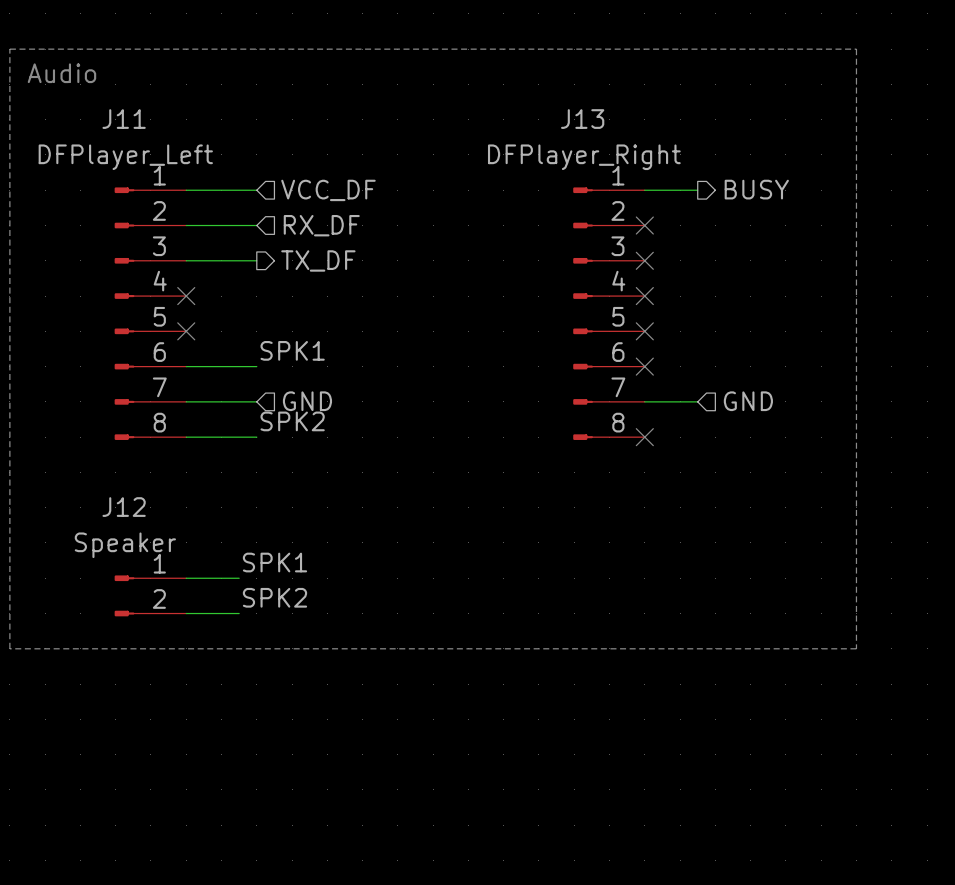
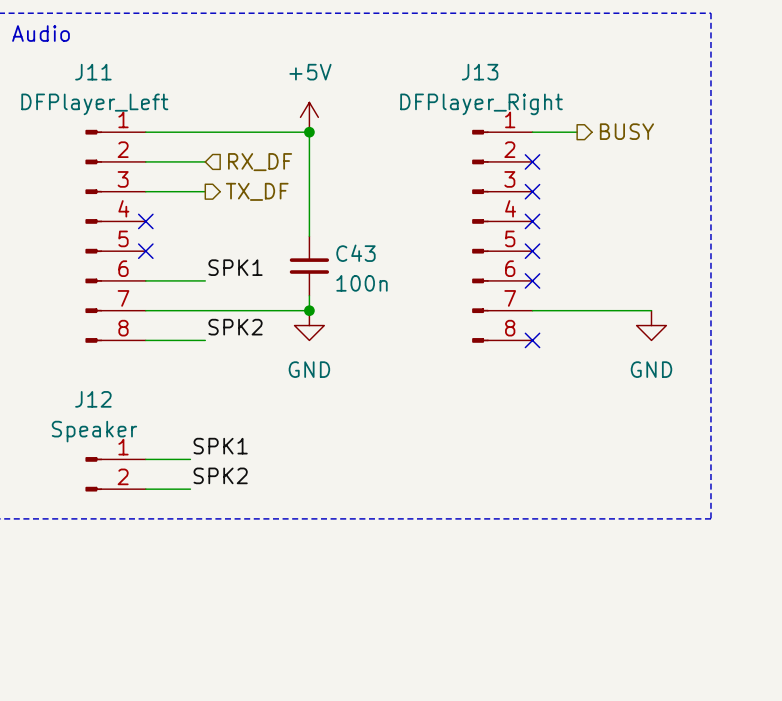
power symbol: none -> +5V (309, 117)
wire: none -> (205, 132) (309, 132) (309, 236)
hierarchical label: VCC_DF (328, 190) -> none
junction: none -> (309, 132)
C43: none -> 100n (309, 266)
wire: none -> (309, 295) (309, 310) (205, 310)
hierarchical label: GND (307, 401) -> none
junction: none -> (309, 310)
wire: none -> (577, 310) (651, 310)
hierarchical label: GND (748, 401) -> none
power symbol: none -> GND (309, 325)
power symbol: none -> GND (651, 325)

